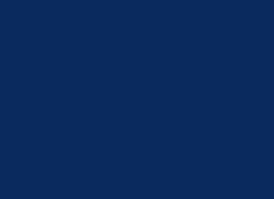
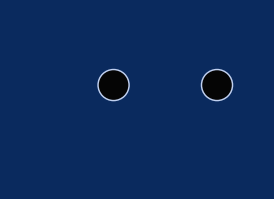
part: none -> (165, 85)

